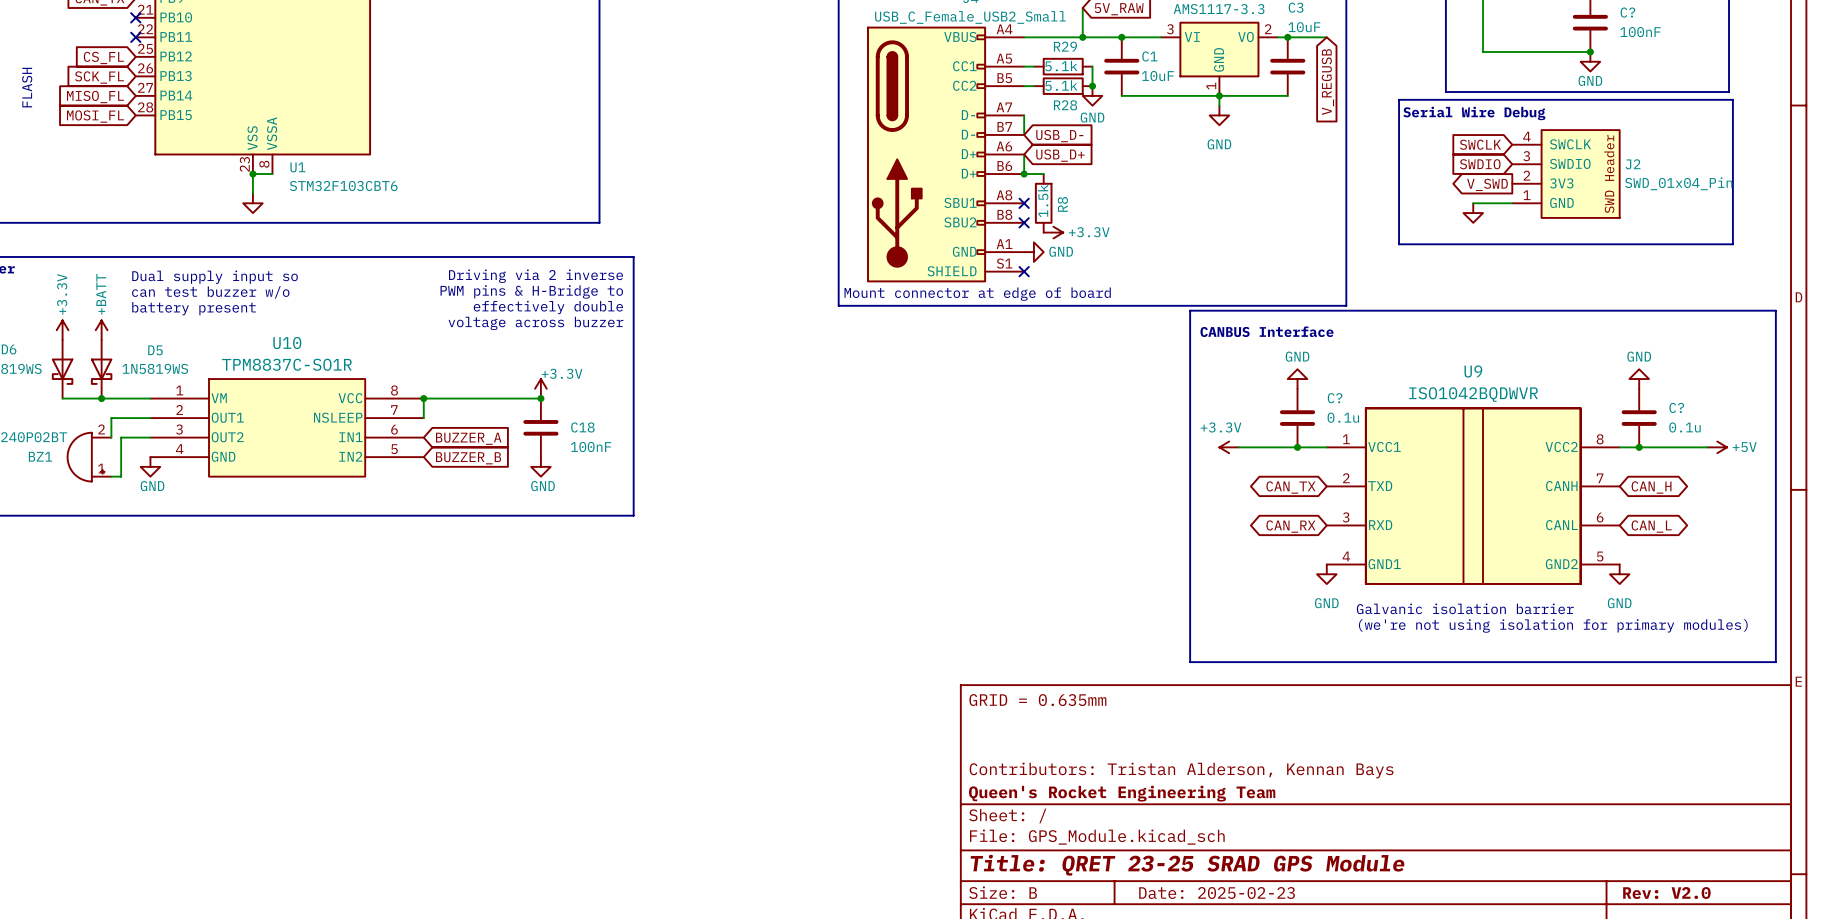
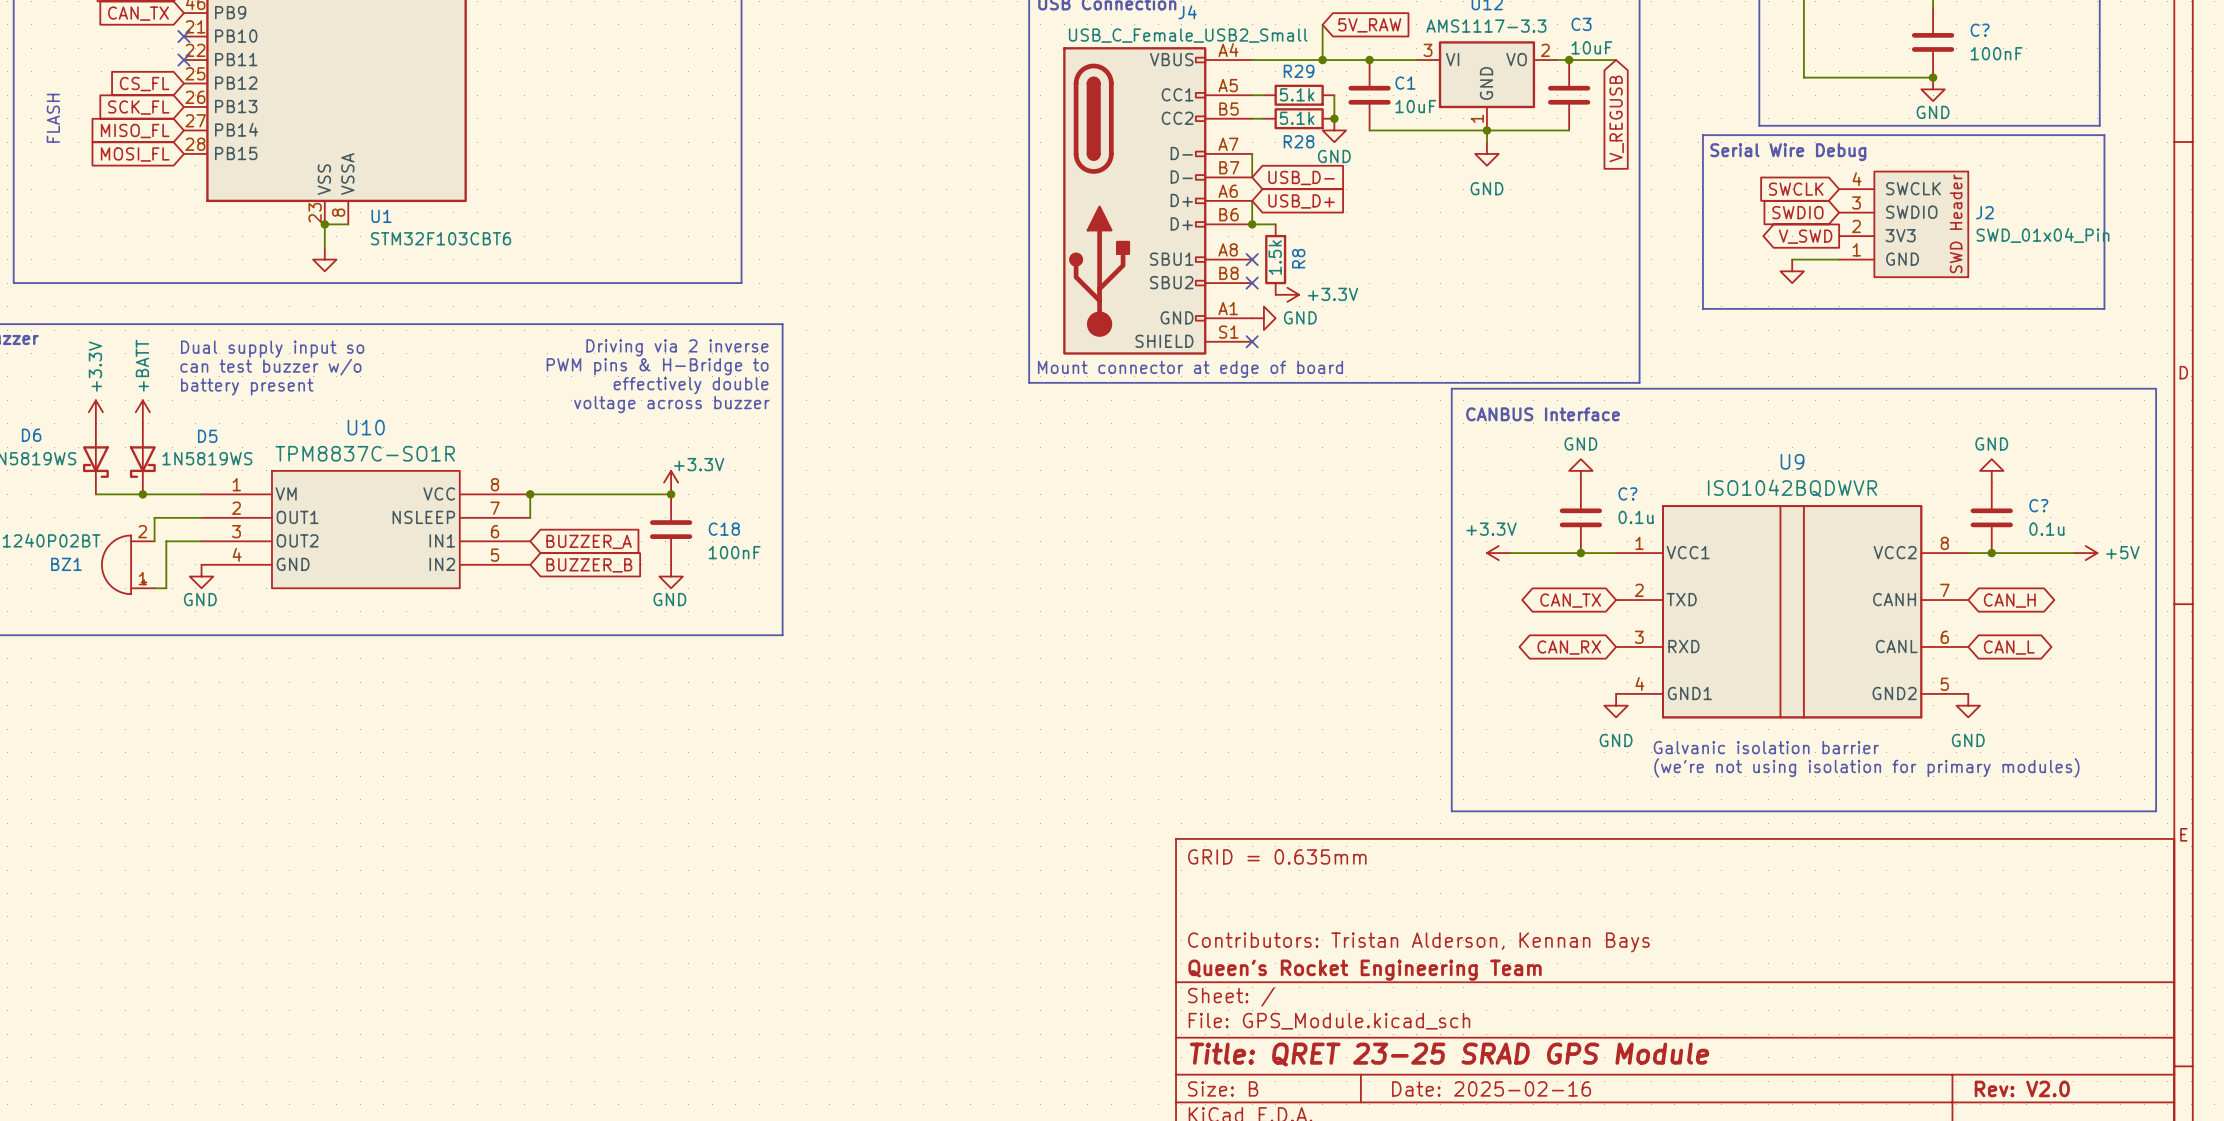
title block: Date: 2025-02-23 (1217, 893) -> Date: 2025-02-16 (1491, 1088)

